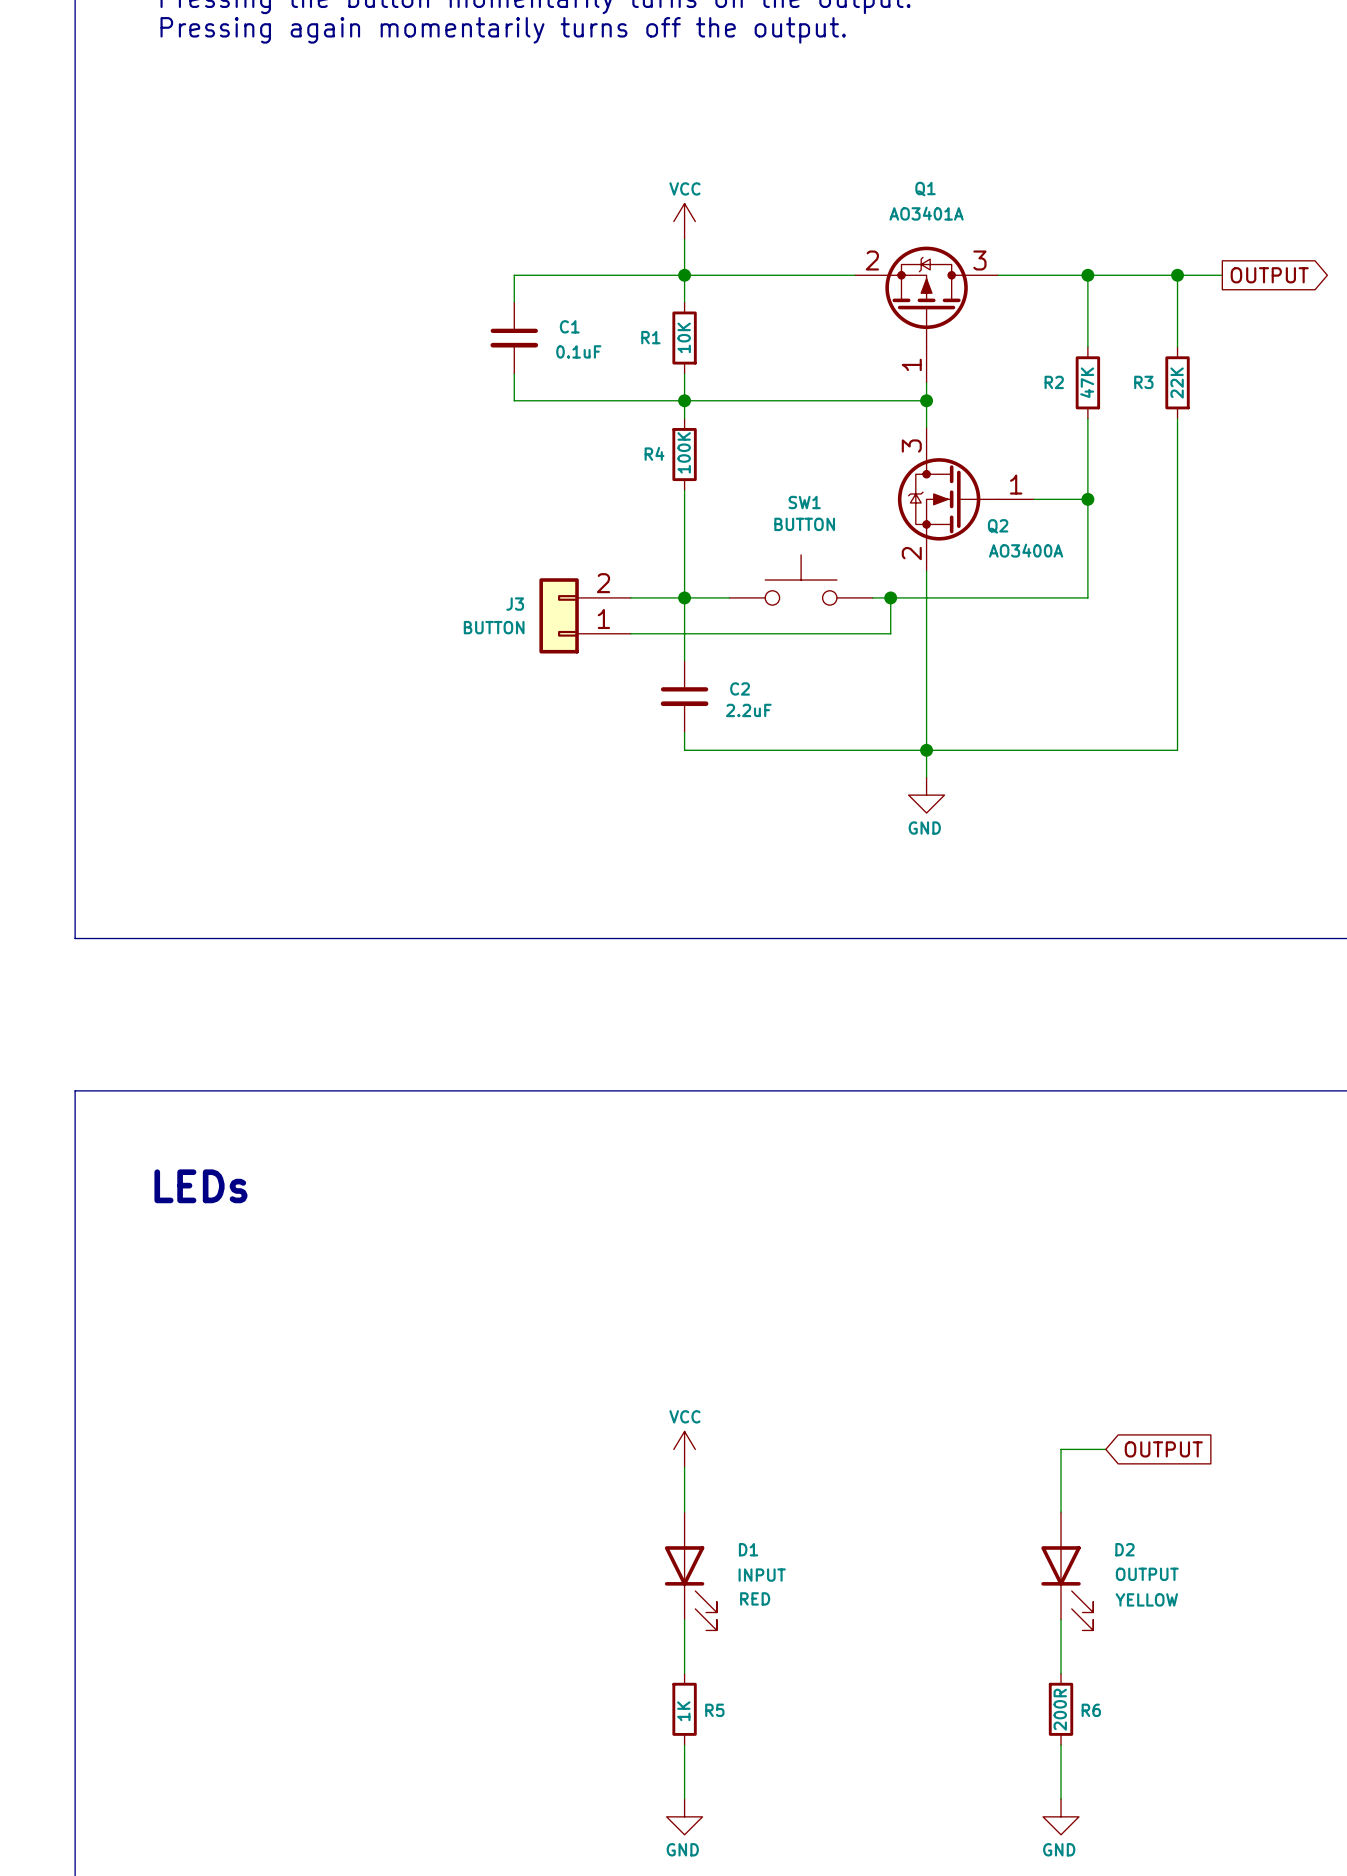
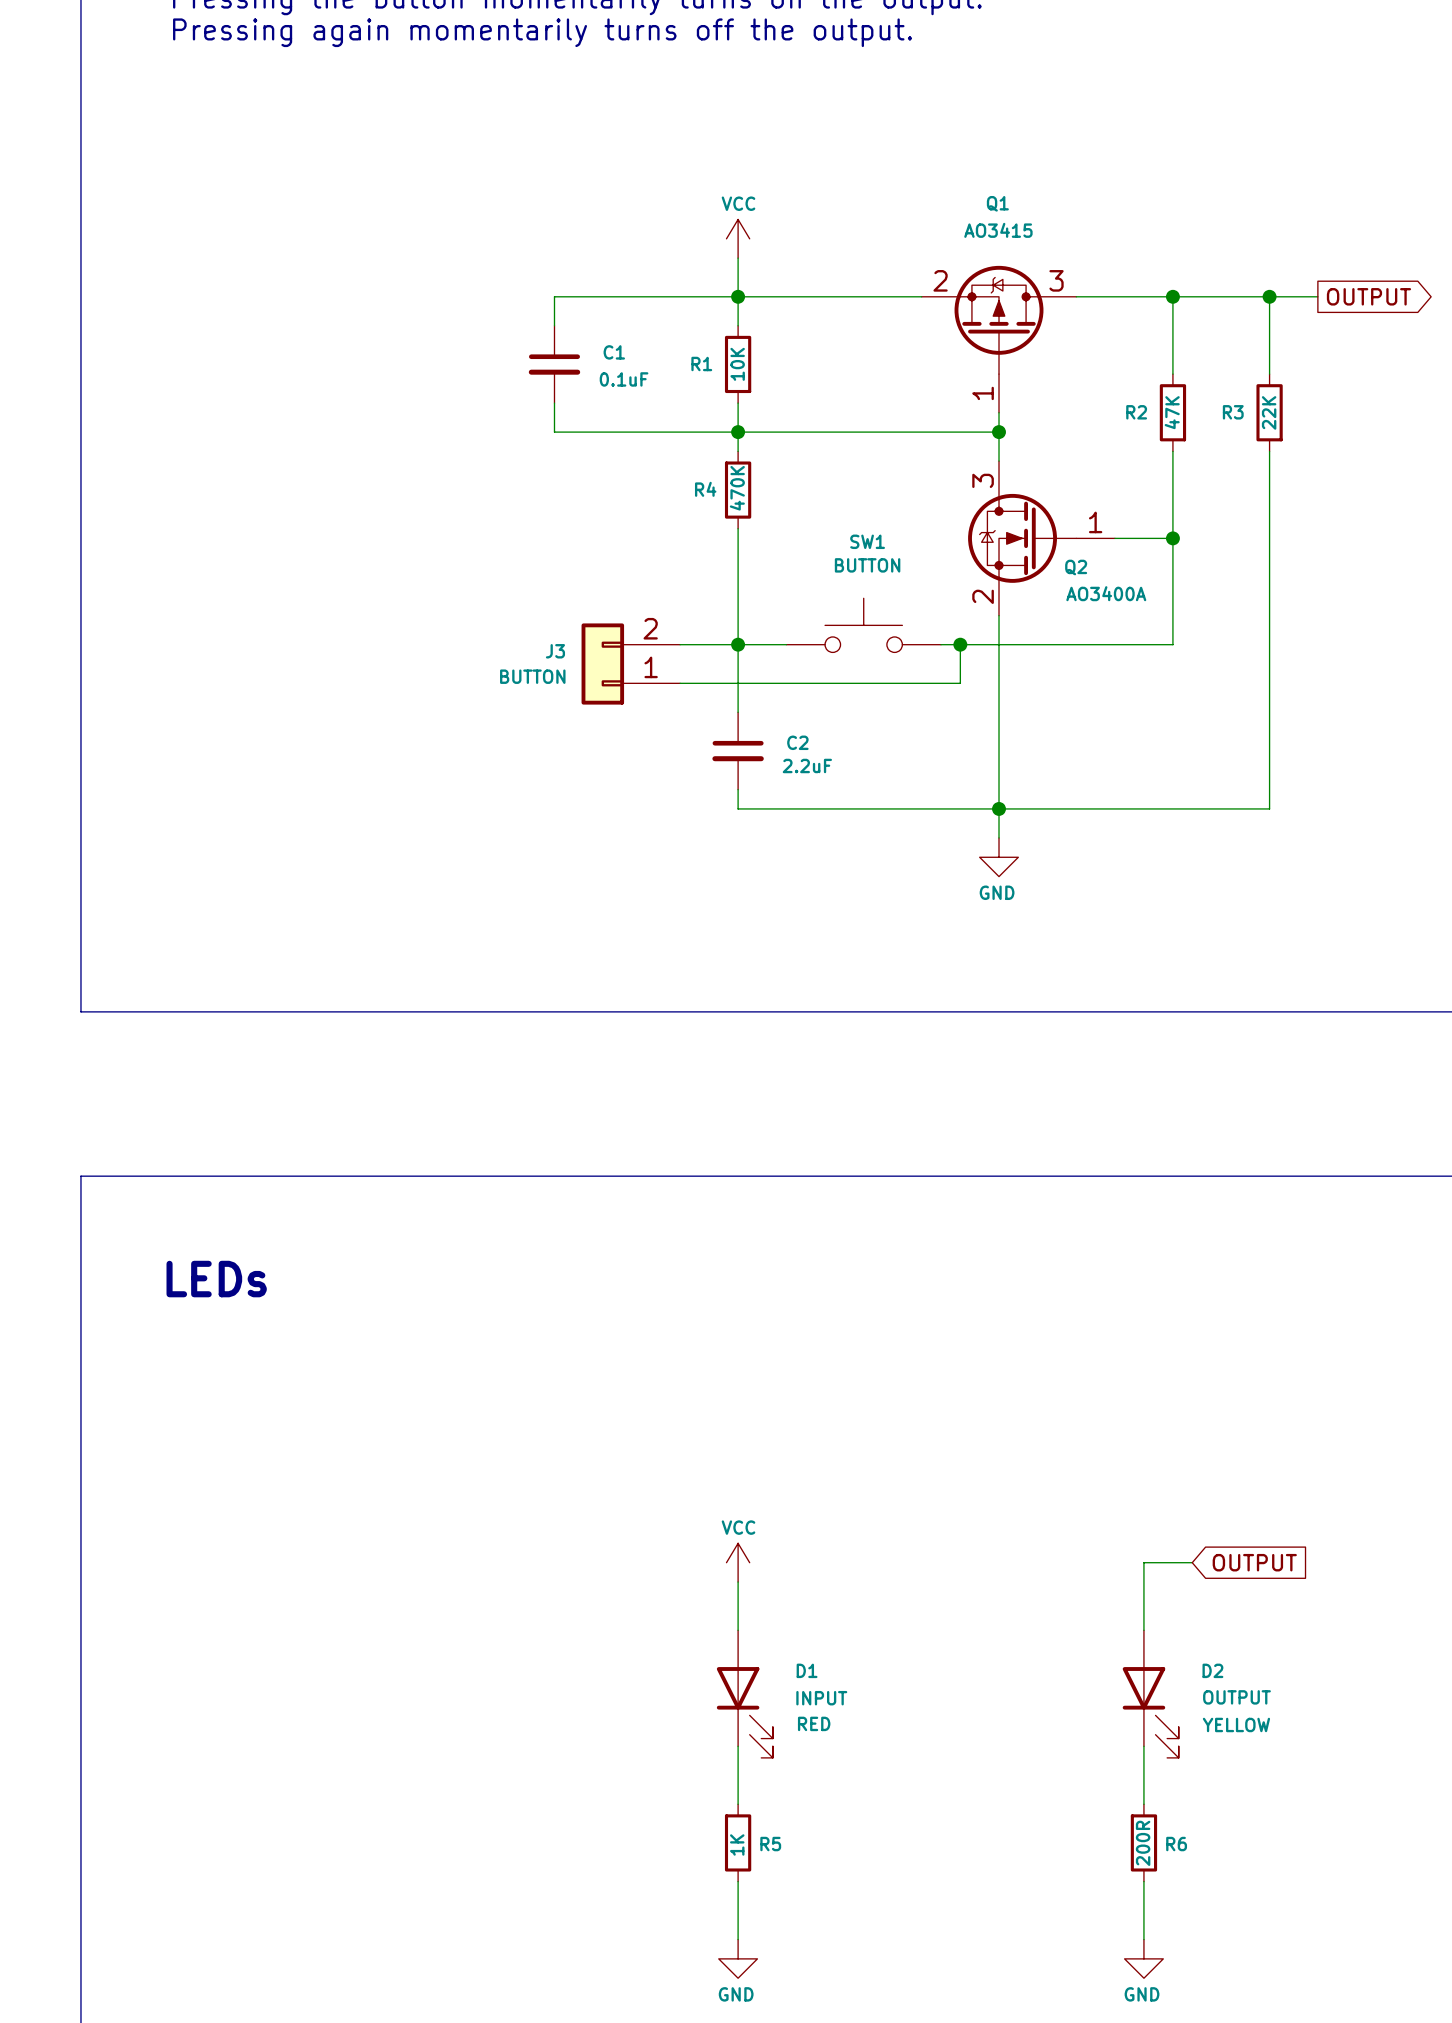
Q1 value: AO3401A (926, 213) -> AO3415 (998, 230)
R4 value: 100K (684, 452) -> 470K (737, 488)

